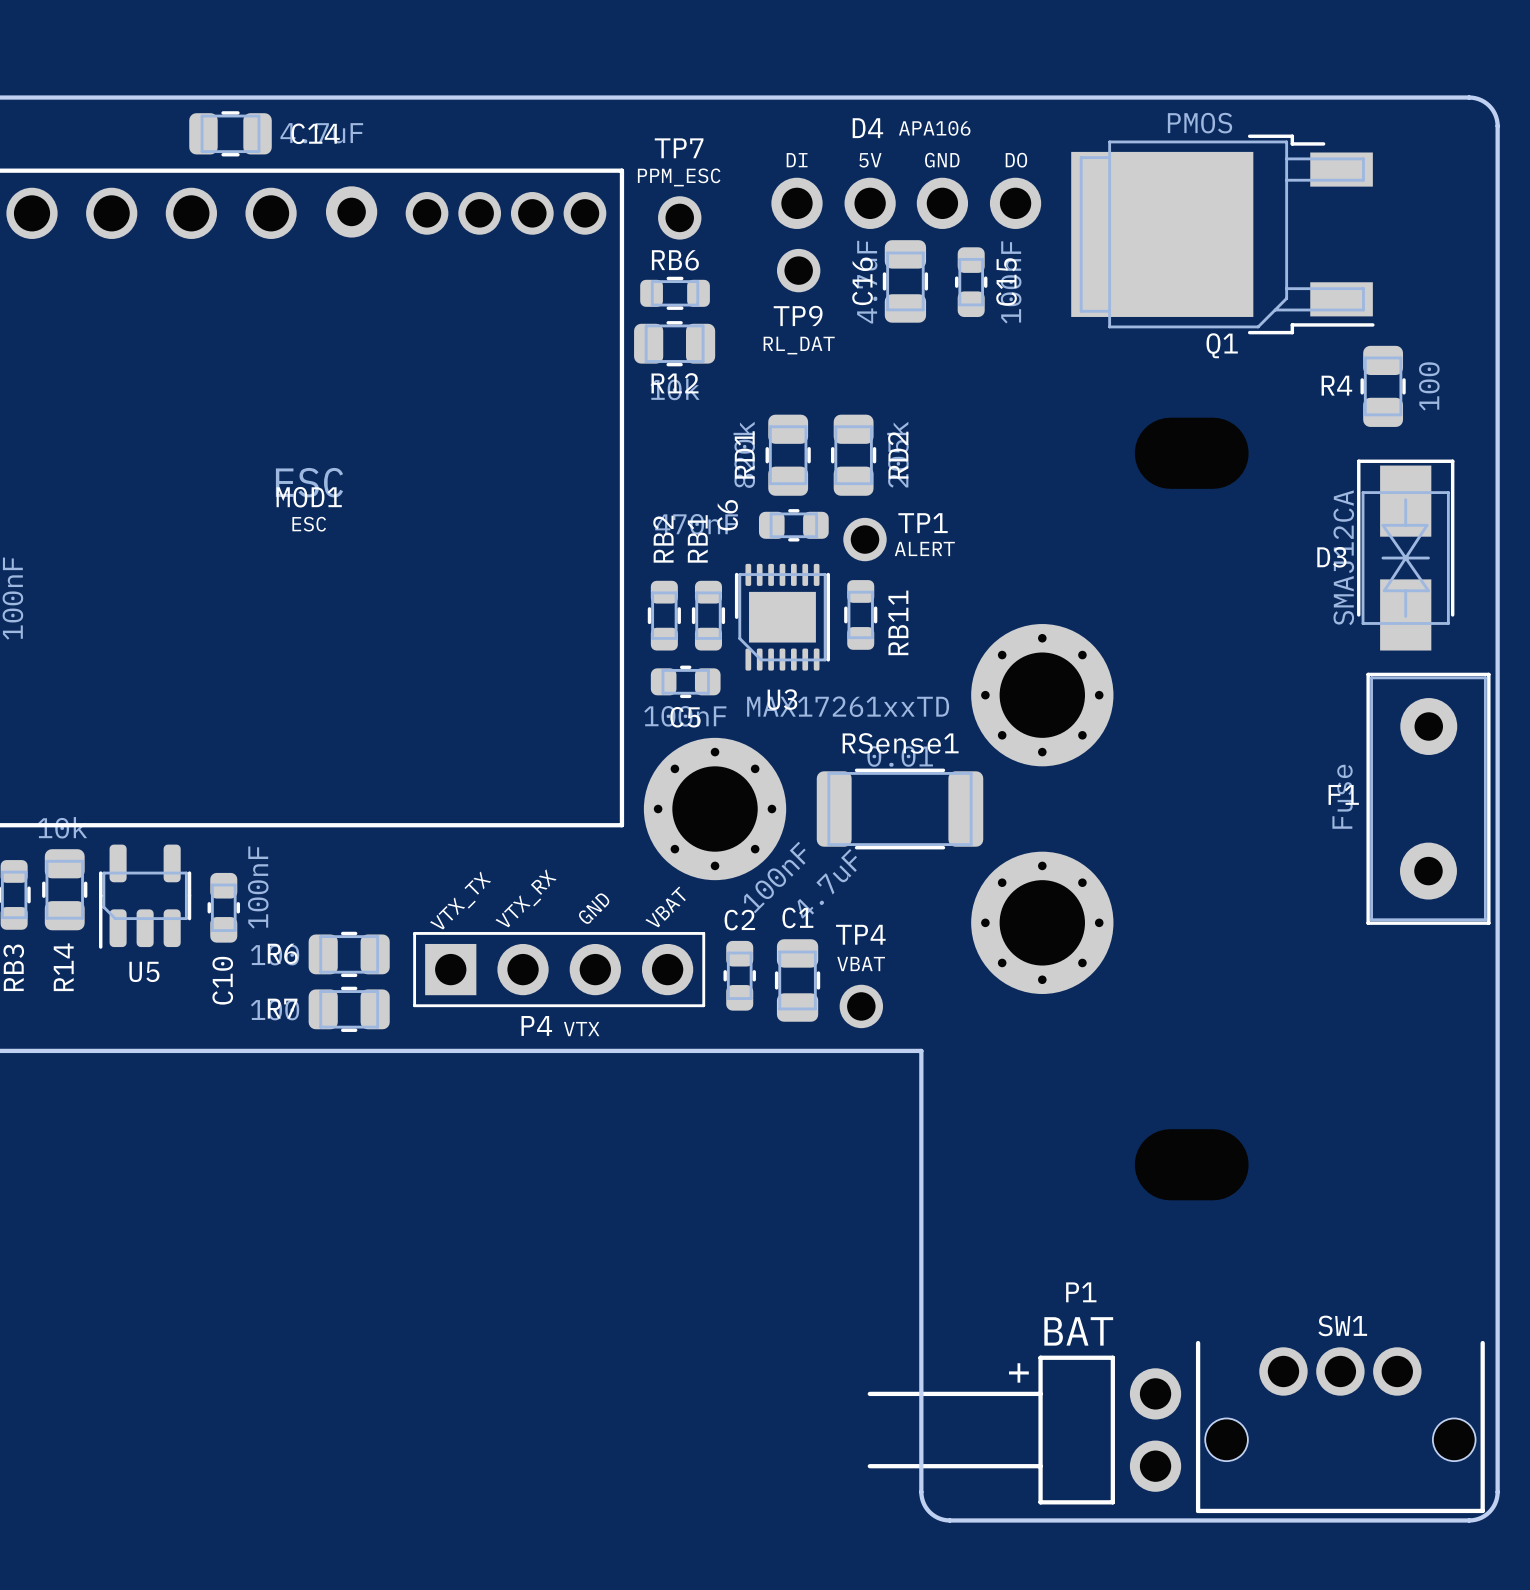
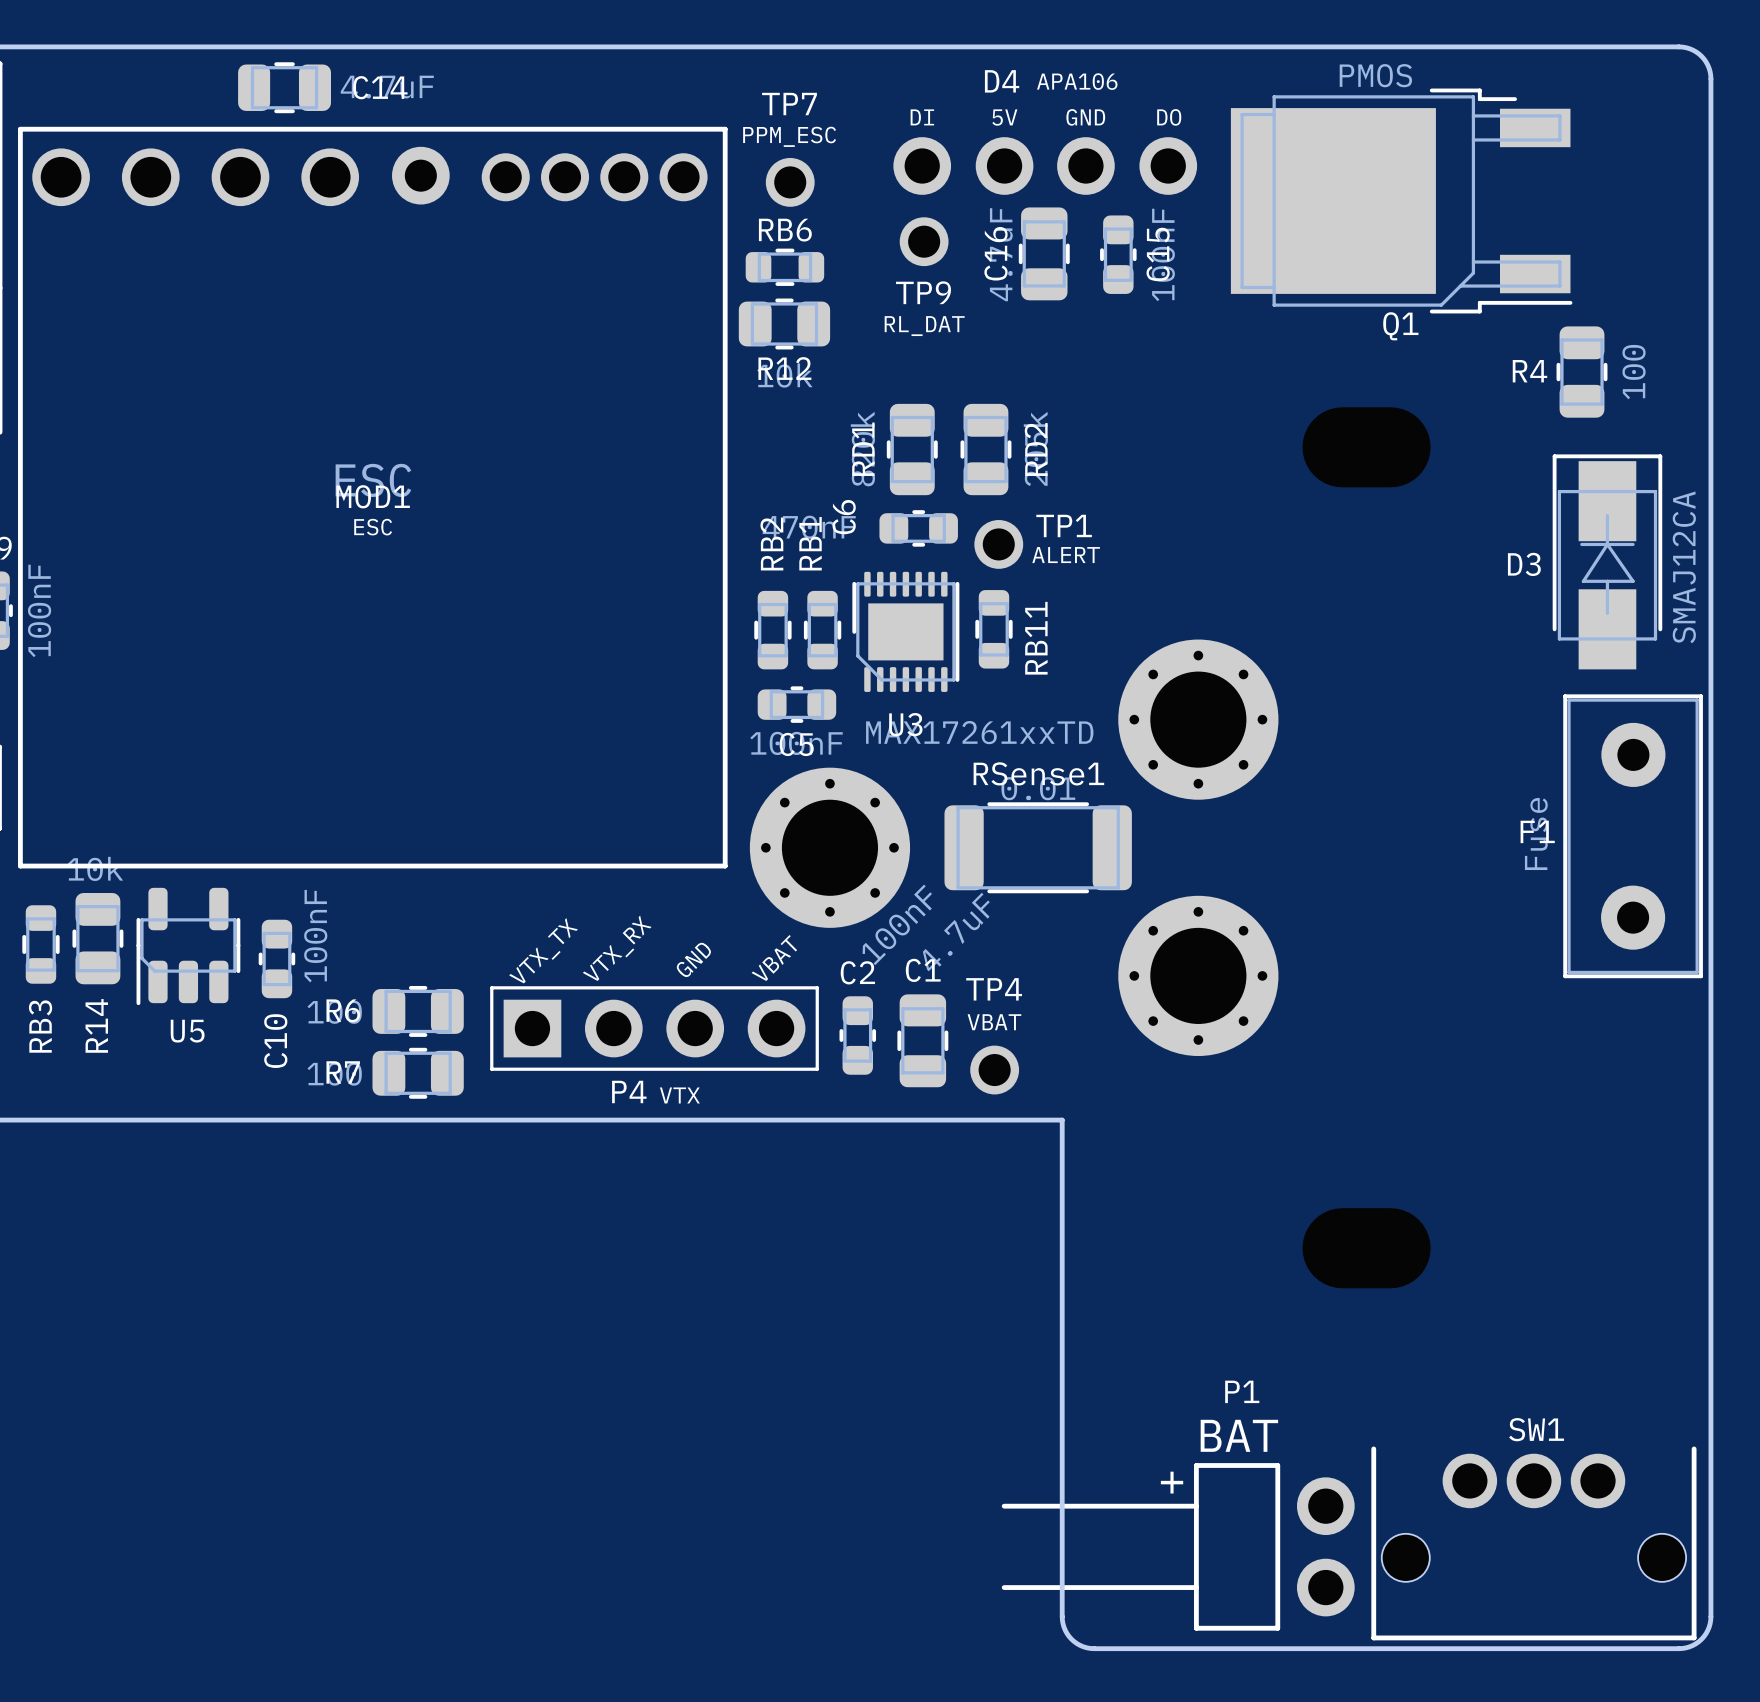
D3 footprint: [1357, 459, 1455, 651] -> [1552, 454, 1663, 670]
D3 value position: SMAJ12CA (1343, 557) -> SMAJ12CA (1684, 567)

